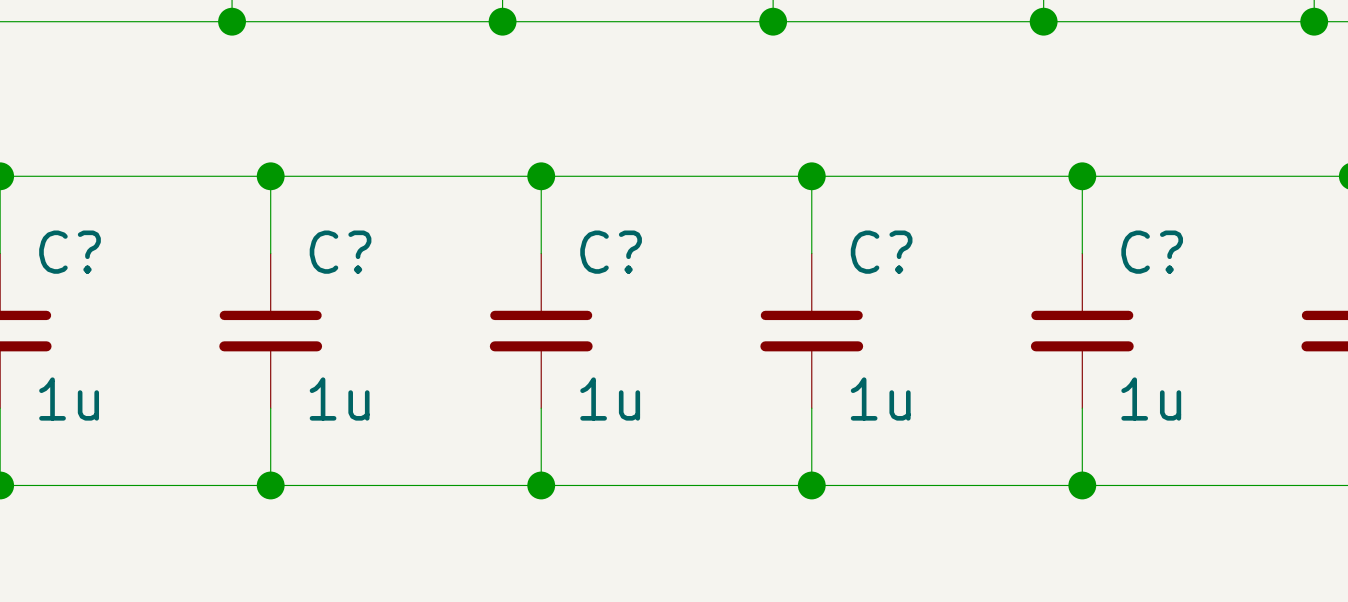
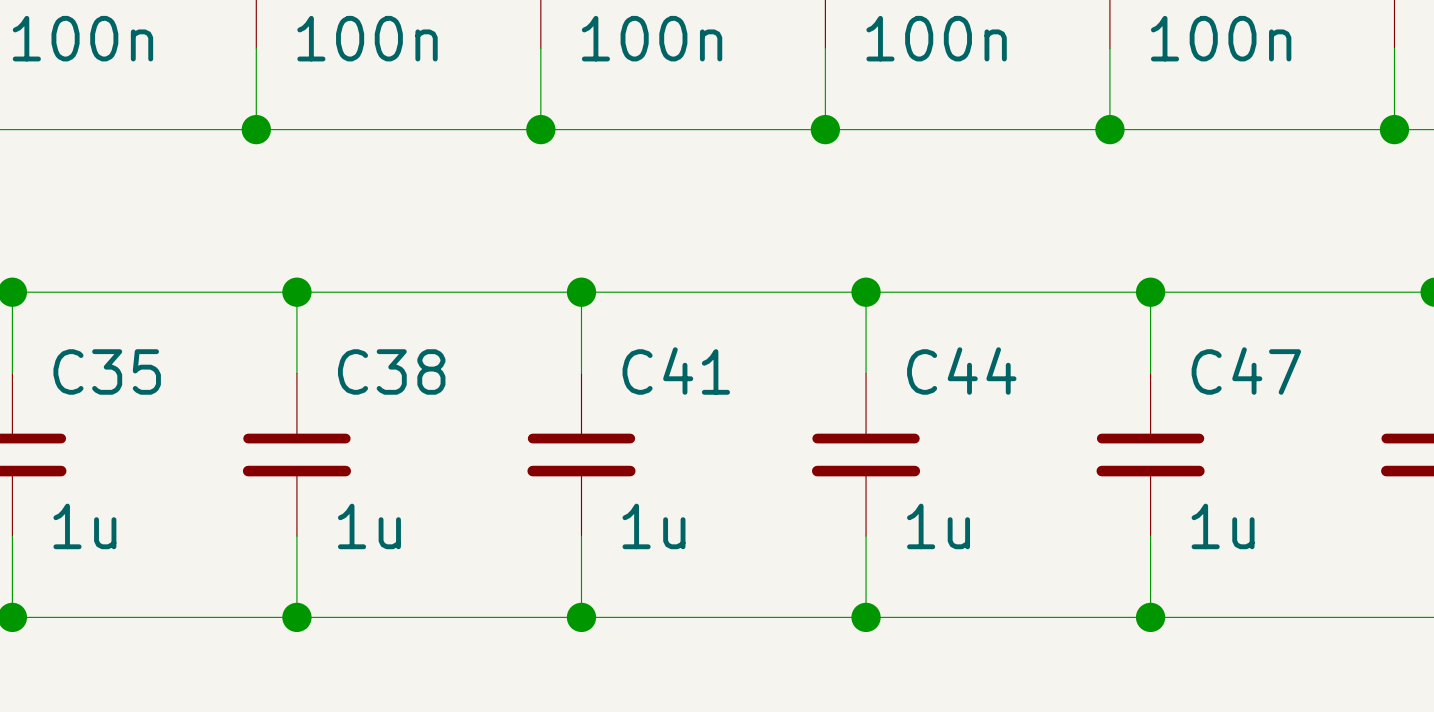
C? name: C? (70, 252) -> C35 (107, 371)
C? name: C? (340, 252) -> C38 (391, 371)
C? name: C? (611, 252) -> C41 (676, 371)
C? name: C? (881, 252) -> C44 (961, 371)
C? name: C? (1152, 252) -> C47 (1246, 371)

